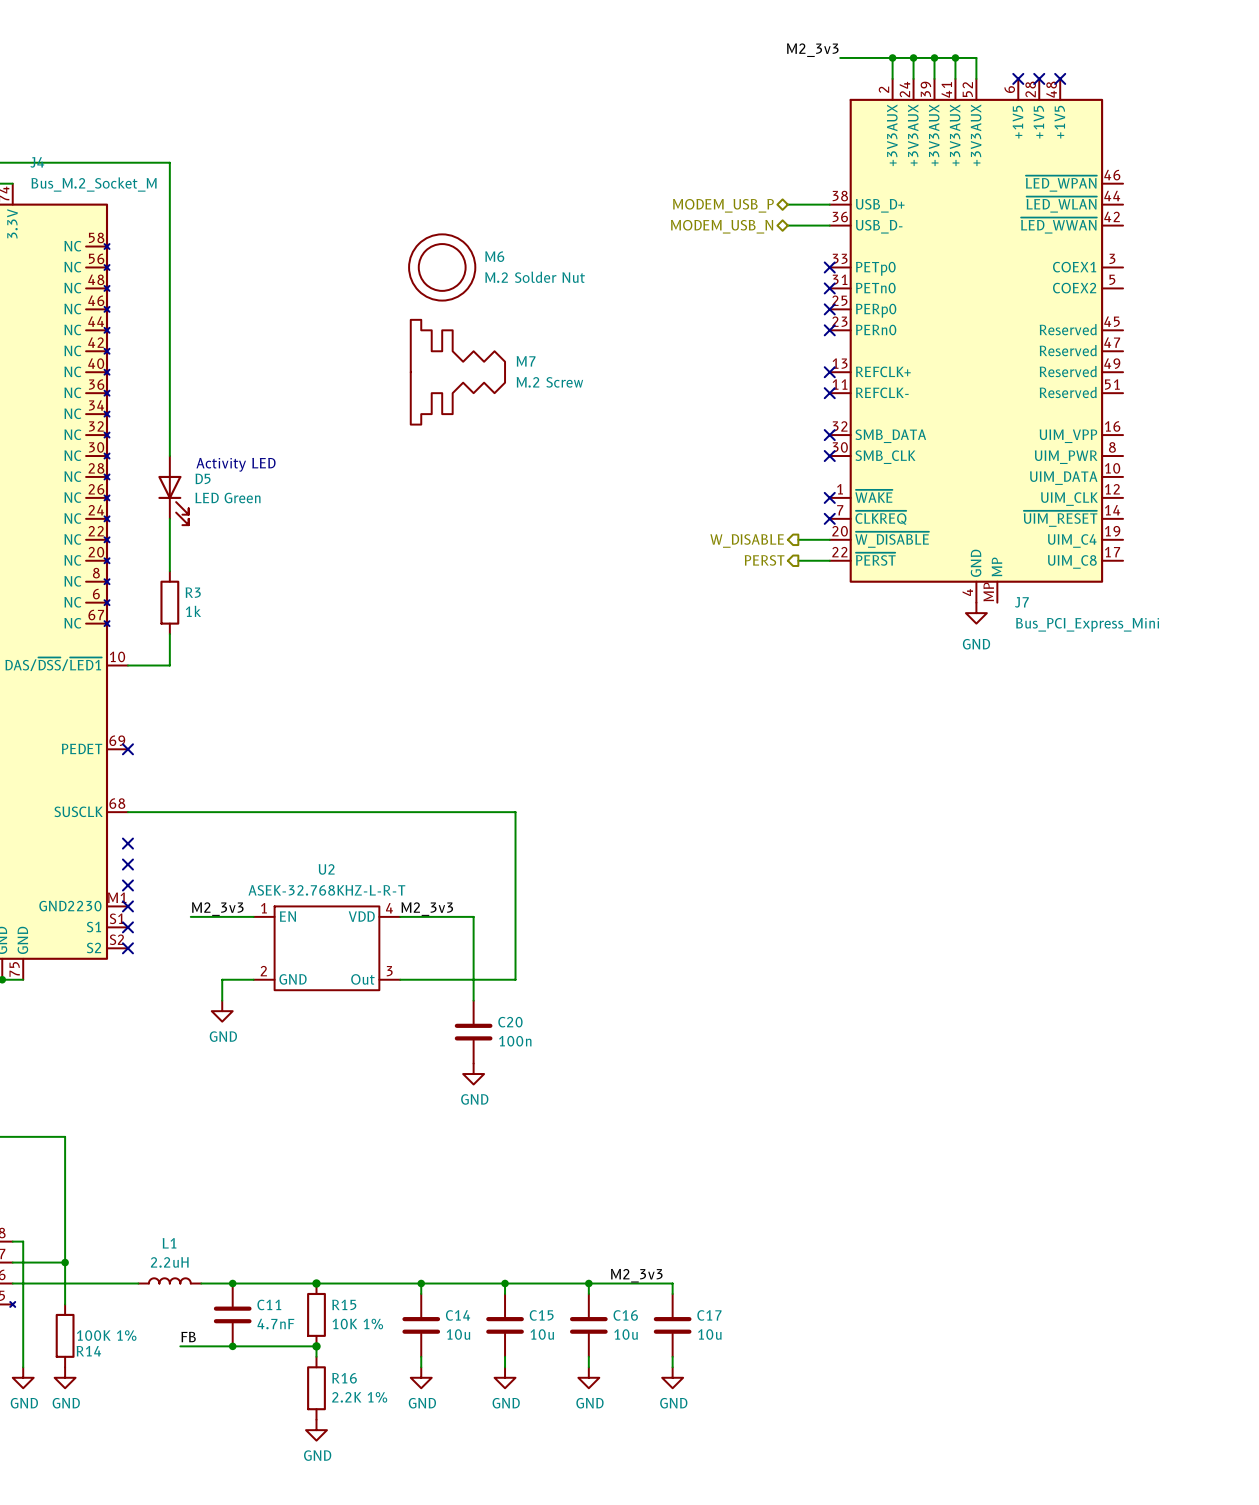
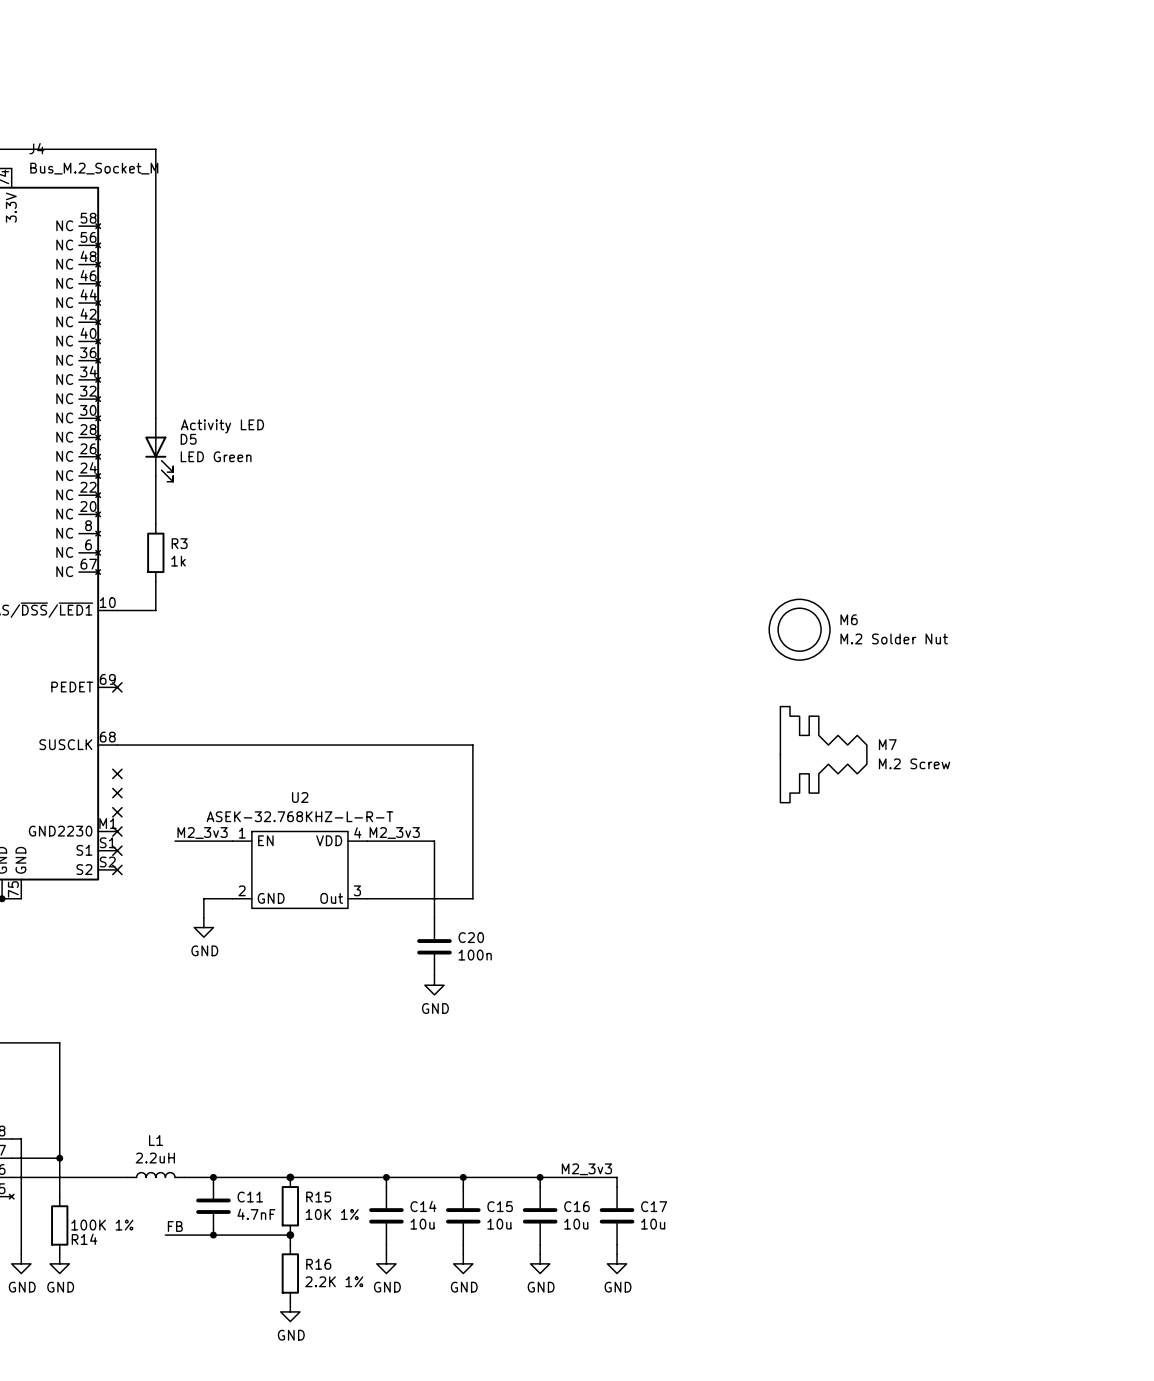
label: M2_3v3 (812, 50) -> none
wire: (840, 57) (976, 57) (976, 78) -> none
wire: (892, 57) (892, 78) -> none
junction: (892, 57) -> none
wire: (913, 57) (913, 78) -> none
junction: (913, 57) -> none
wire: (934, 57) (934, 78) -> none
junction: (934, 57) -> none
wire: (955, 57) (955, 78) -> none
junction: (955, 57) -> none
no-connect mark: (1018, 78) -> none
no-connect mark: (1039, 78) -> none
no-connect mark: (1060, 78) -> none
wire: (787, 204) (829, 204) -> none
hierarchical label: MODEM_USB_P (723, 205) -> none
wire: (787, 225) (829, 225) -> none
hierarchical label: MODEM_USB_N (722, 226) -> none
M6 position: (442, 267) -> (799, 629)
no-connect mark: (829, 267) -> none
no-connect mark: (829, 288) -> none
no-connect mark: (829, 309) -> none
no-connect mark: (829, 330) -> none
J7: Bus_PCI_Express_Mini (976, 340) -> none
M7 position: (457, 372) -> (823, 754)
no-connect mark: (829, 372) -> none
no-connect mark: (829, 393) -> none
no-connect mark: (829, 435) -> none
no-connect mark: (829, 456) -> none
no-connect mark: (829, 497) -> none
no-connect mark: (829, 518) -> none
wire: (798, 539) (829, 539) -> none
hierarchical label: W_DISABLE (747, 540) -> none
hierarchical label: PERST (764, 560) -> none
wire: (798, 560) (829, 560) -> none
power symbol: GND (976, 613) -> none

